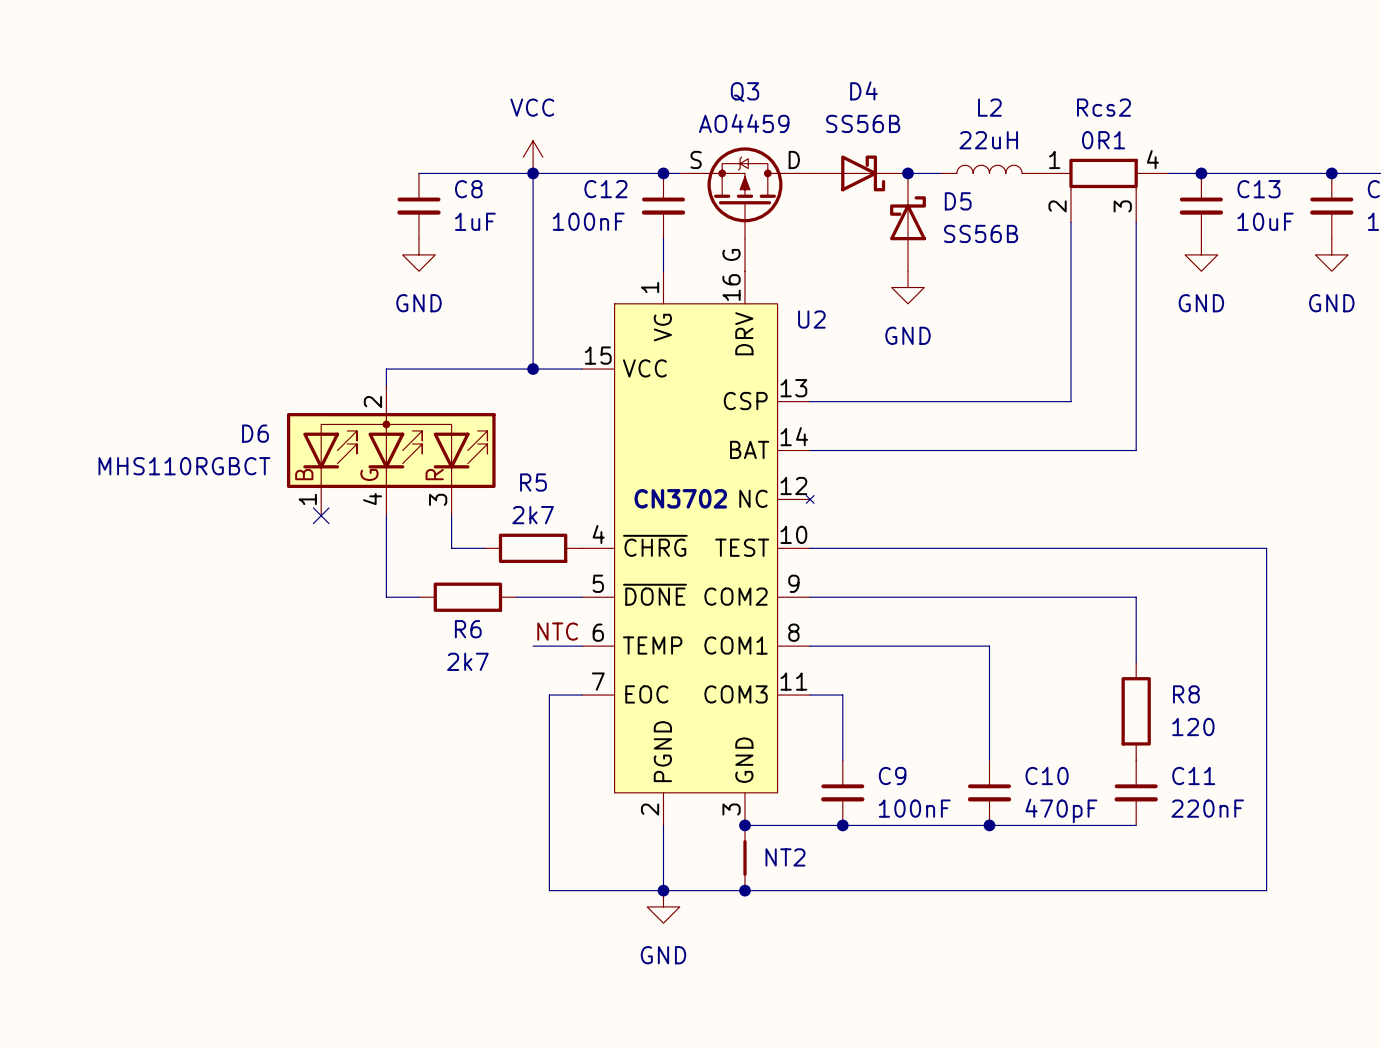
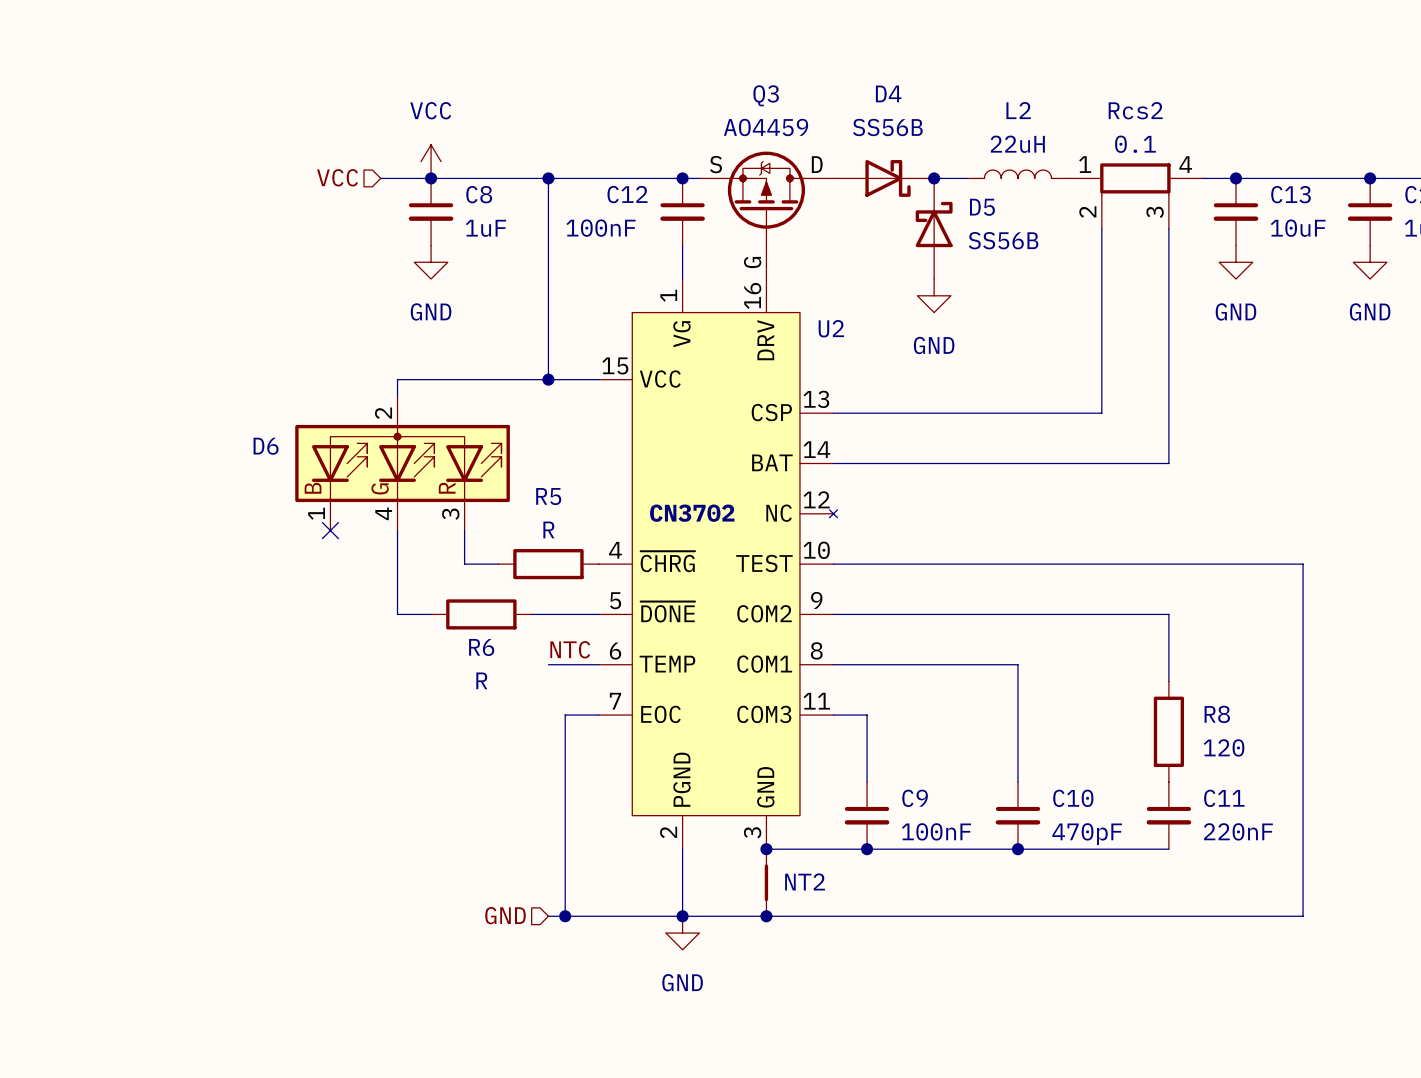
Rcs2 value: 0R1 (1103, 140) -> 0.1 (1135, 144)
power symbol position: VCC (533, 157) -> VCC (431, 161)
hierarchical label: none -> VCC (337, 177)
wire: none -> (380, 178) (431, 178)
junction: none -> (431, 178)
D6 value: MHS110RGBCT (184, 466) -> none
R5 value: 2k7 (533, 515) -> R (548, 529)
R6 value: 2k7 (467, 661) -> R (481, 680)
hierarchical label: none -> GND (505, 915)
wire: none -> (548, 916) (565, 916)
junction: none -> (565, 916)

